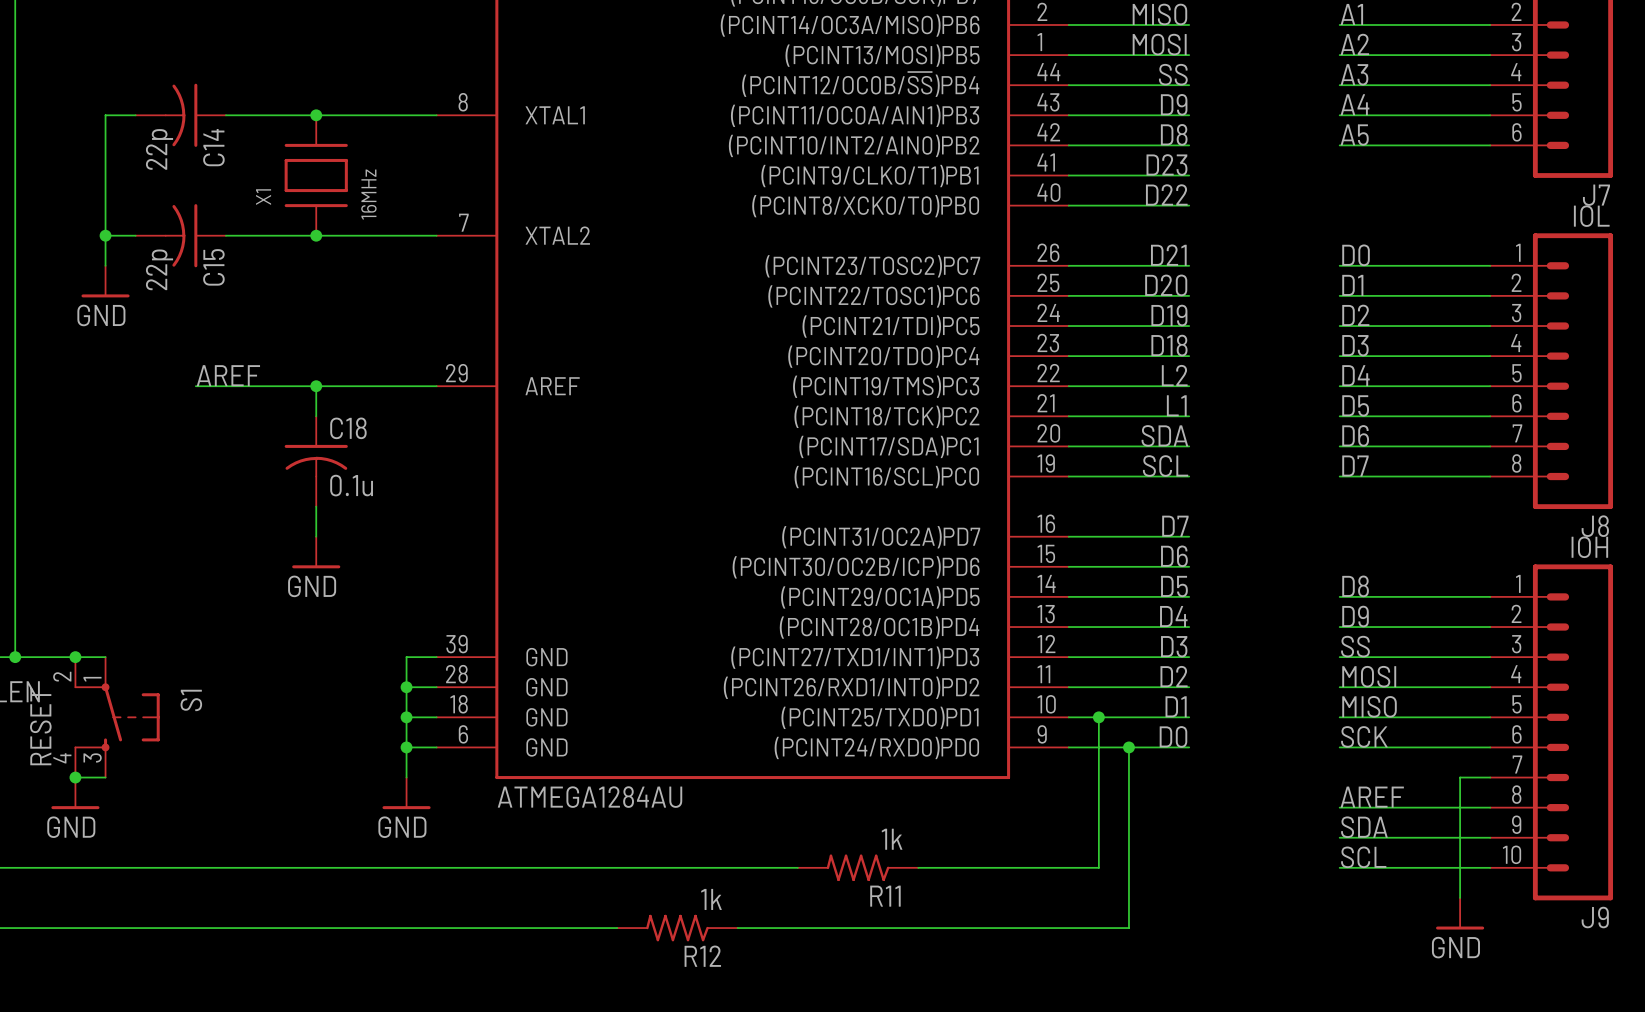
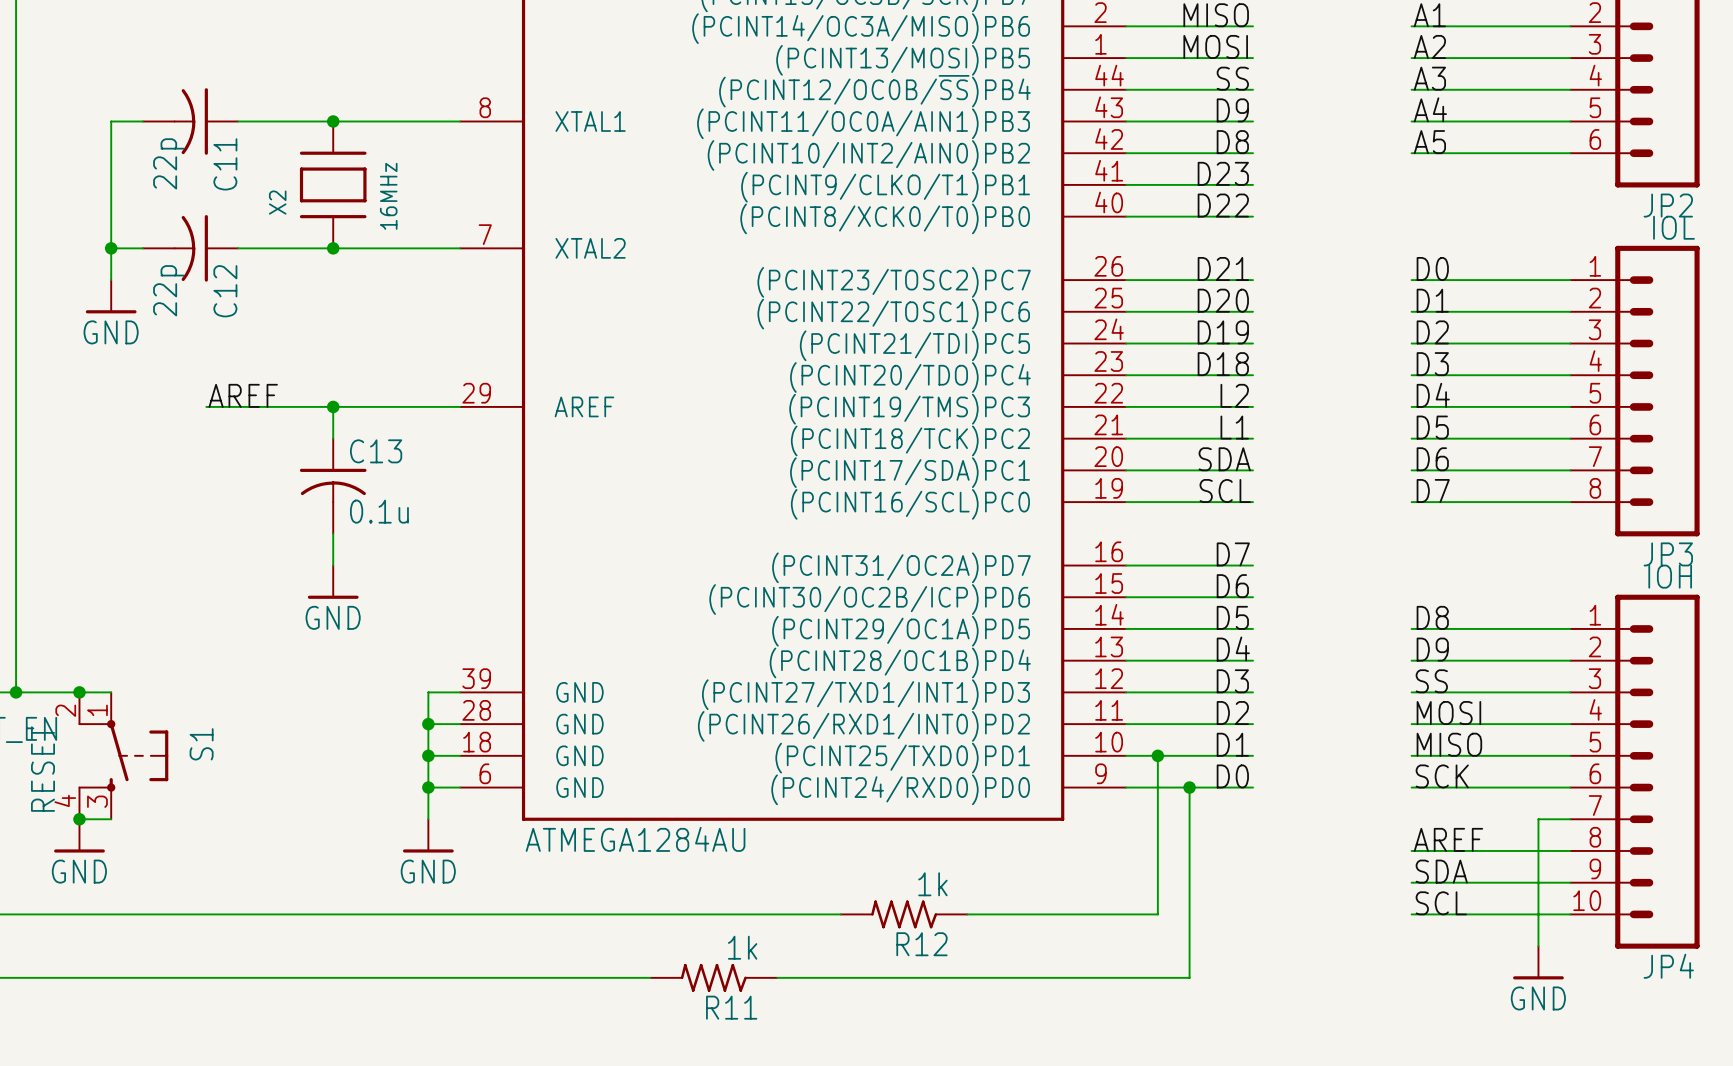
C14 name: C14 (213, 147) -> C11 (225, 164)
J7 name: J7 (1596, 195) -> JP2 (1668, 205)
X1 name: X1 (263, 197) -> X2 (277, 202)
C15 name: C15 (213, 267) -> C12 (225, 291)
C18 name: C18 (348, 428) -> C13 (376, 451)
J8 name: J8 (1595, 526) -> JP3 (1668, 554)
R11 name: R11 (885, 896) -> R12 (921, 944)
J9 name: J9 (1595, 917) -> JP4 (1668, 966)
R12 name: R12 (702, 956) -> R11 (731, 1007)

